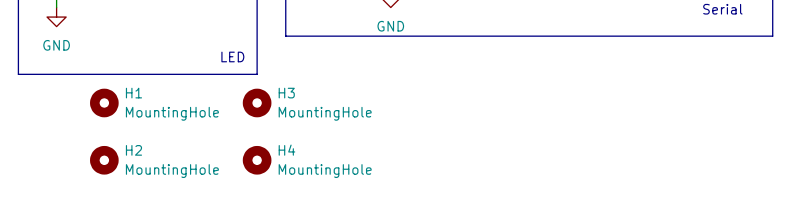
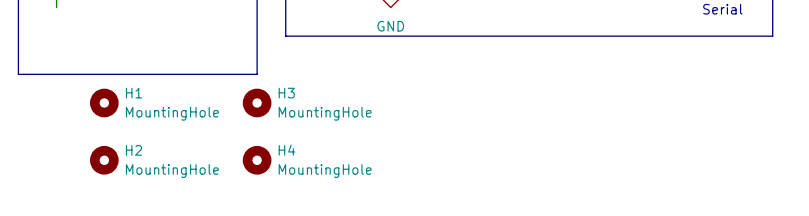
power symbol: GND (56, 17) -> none
text: LED (232, 56) -> none

